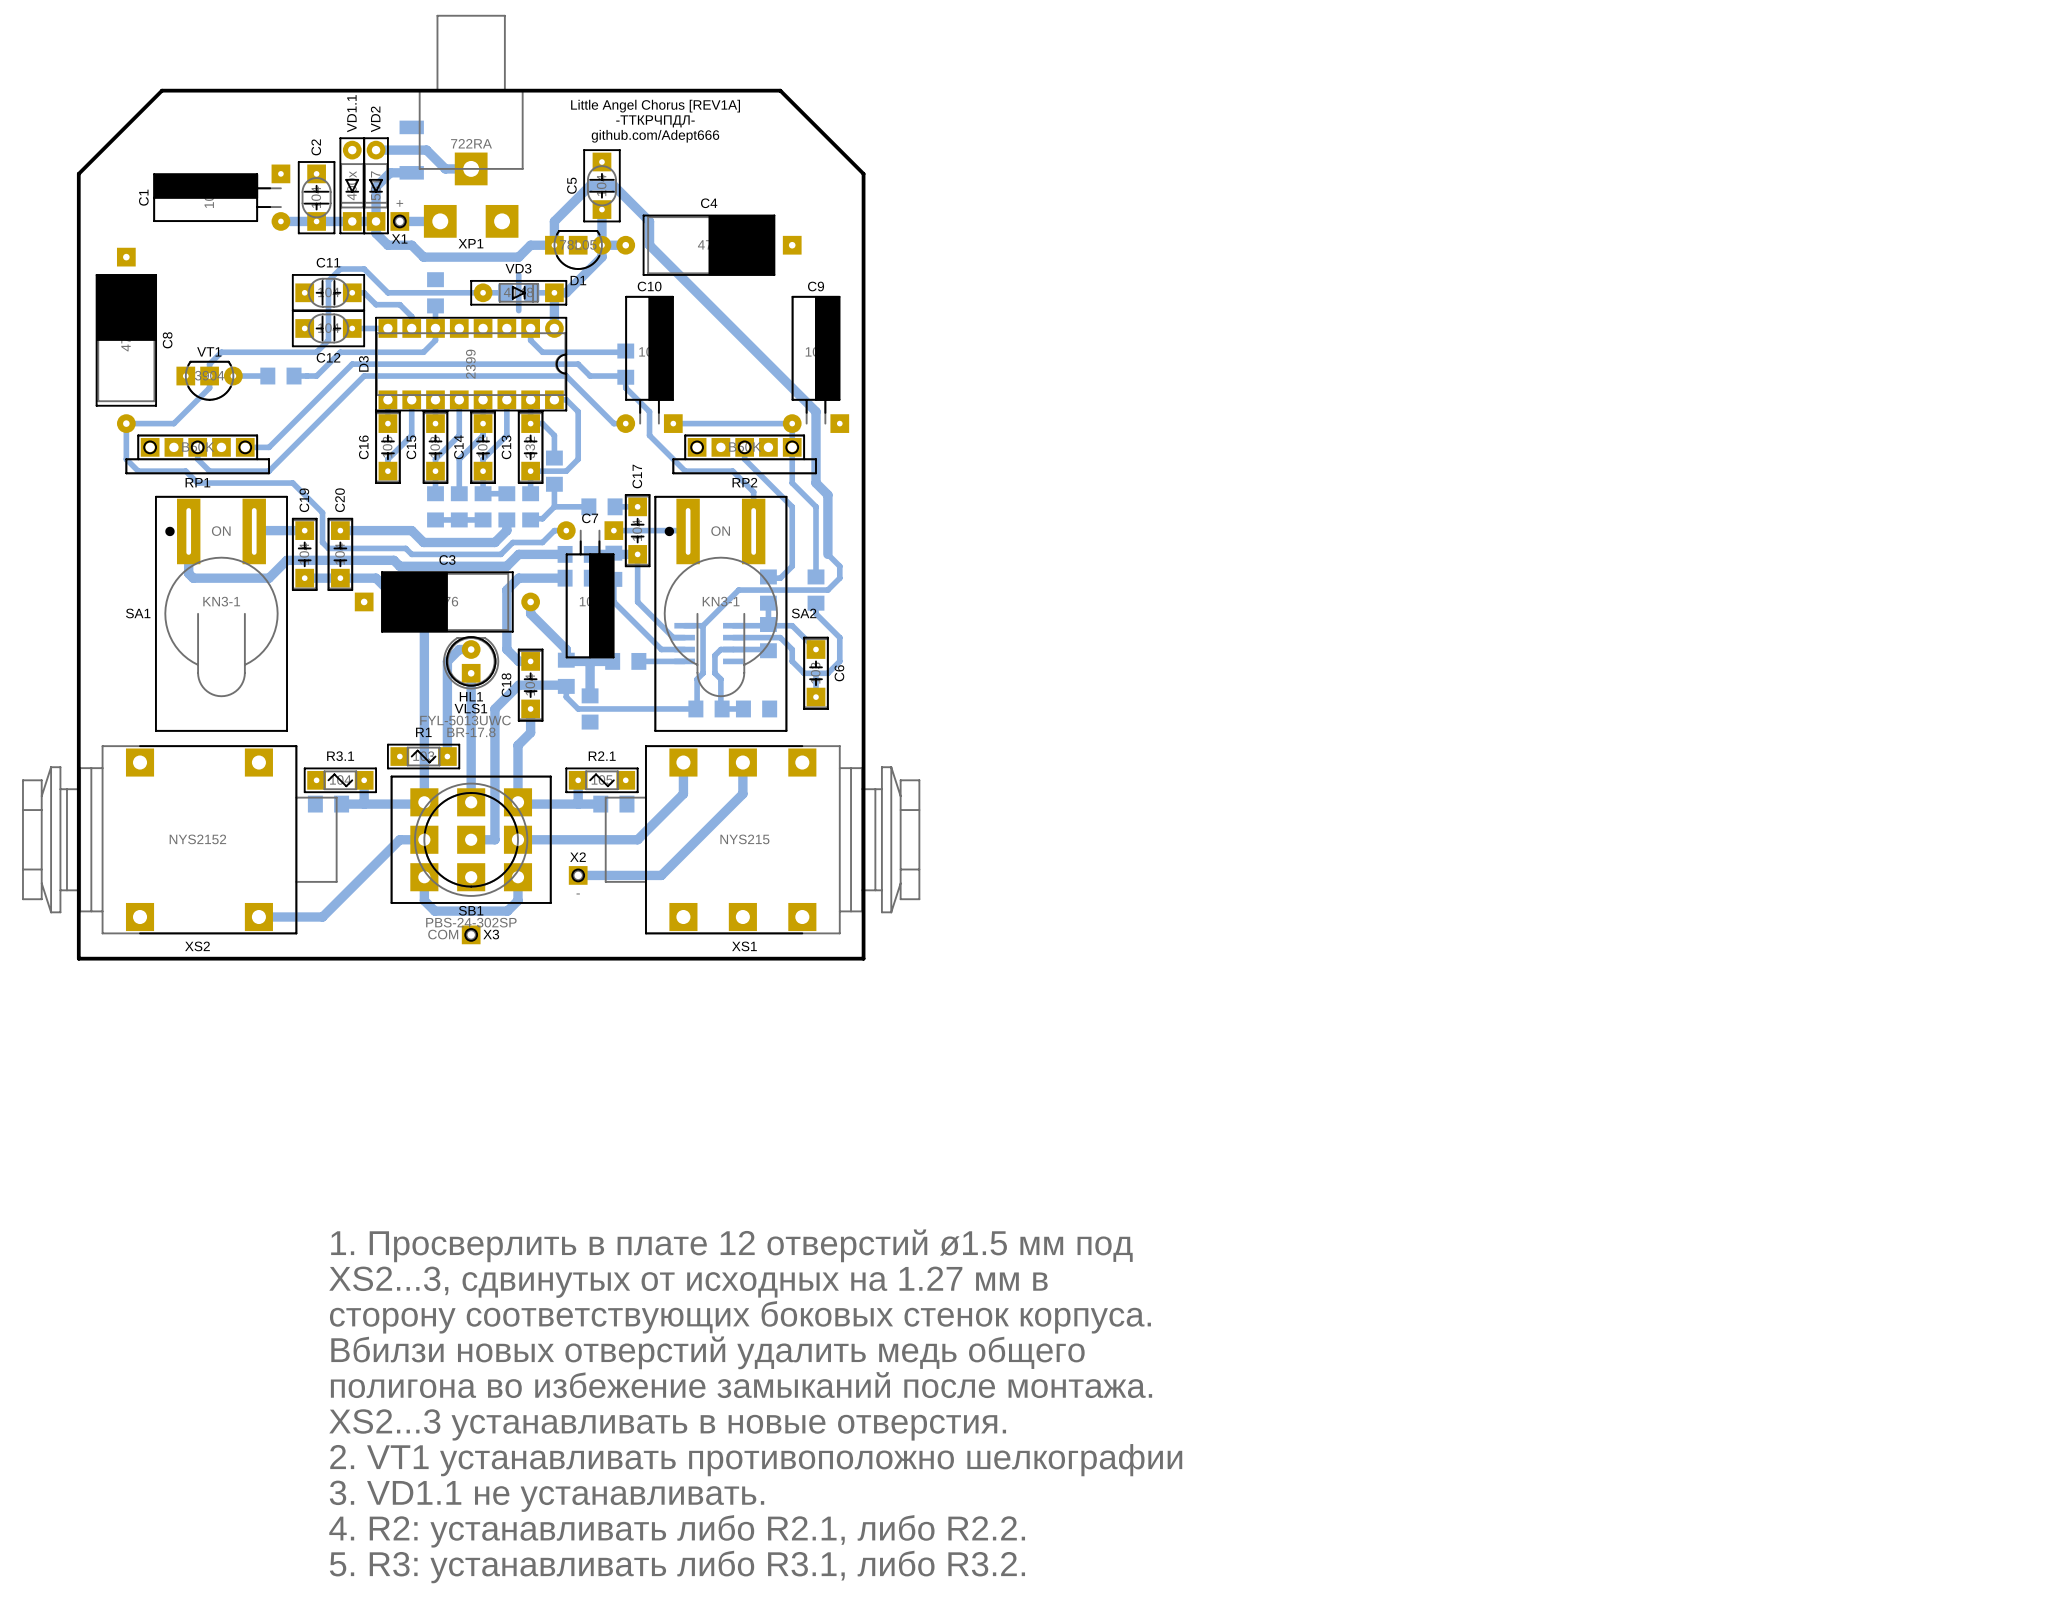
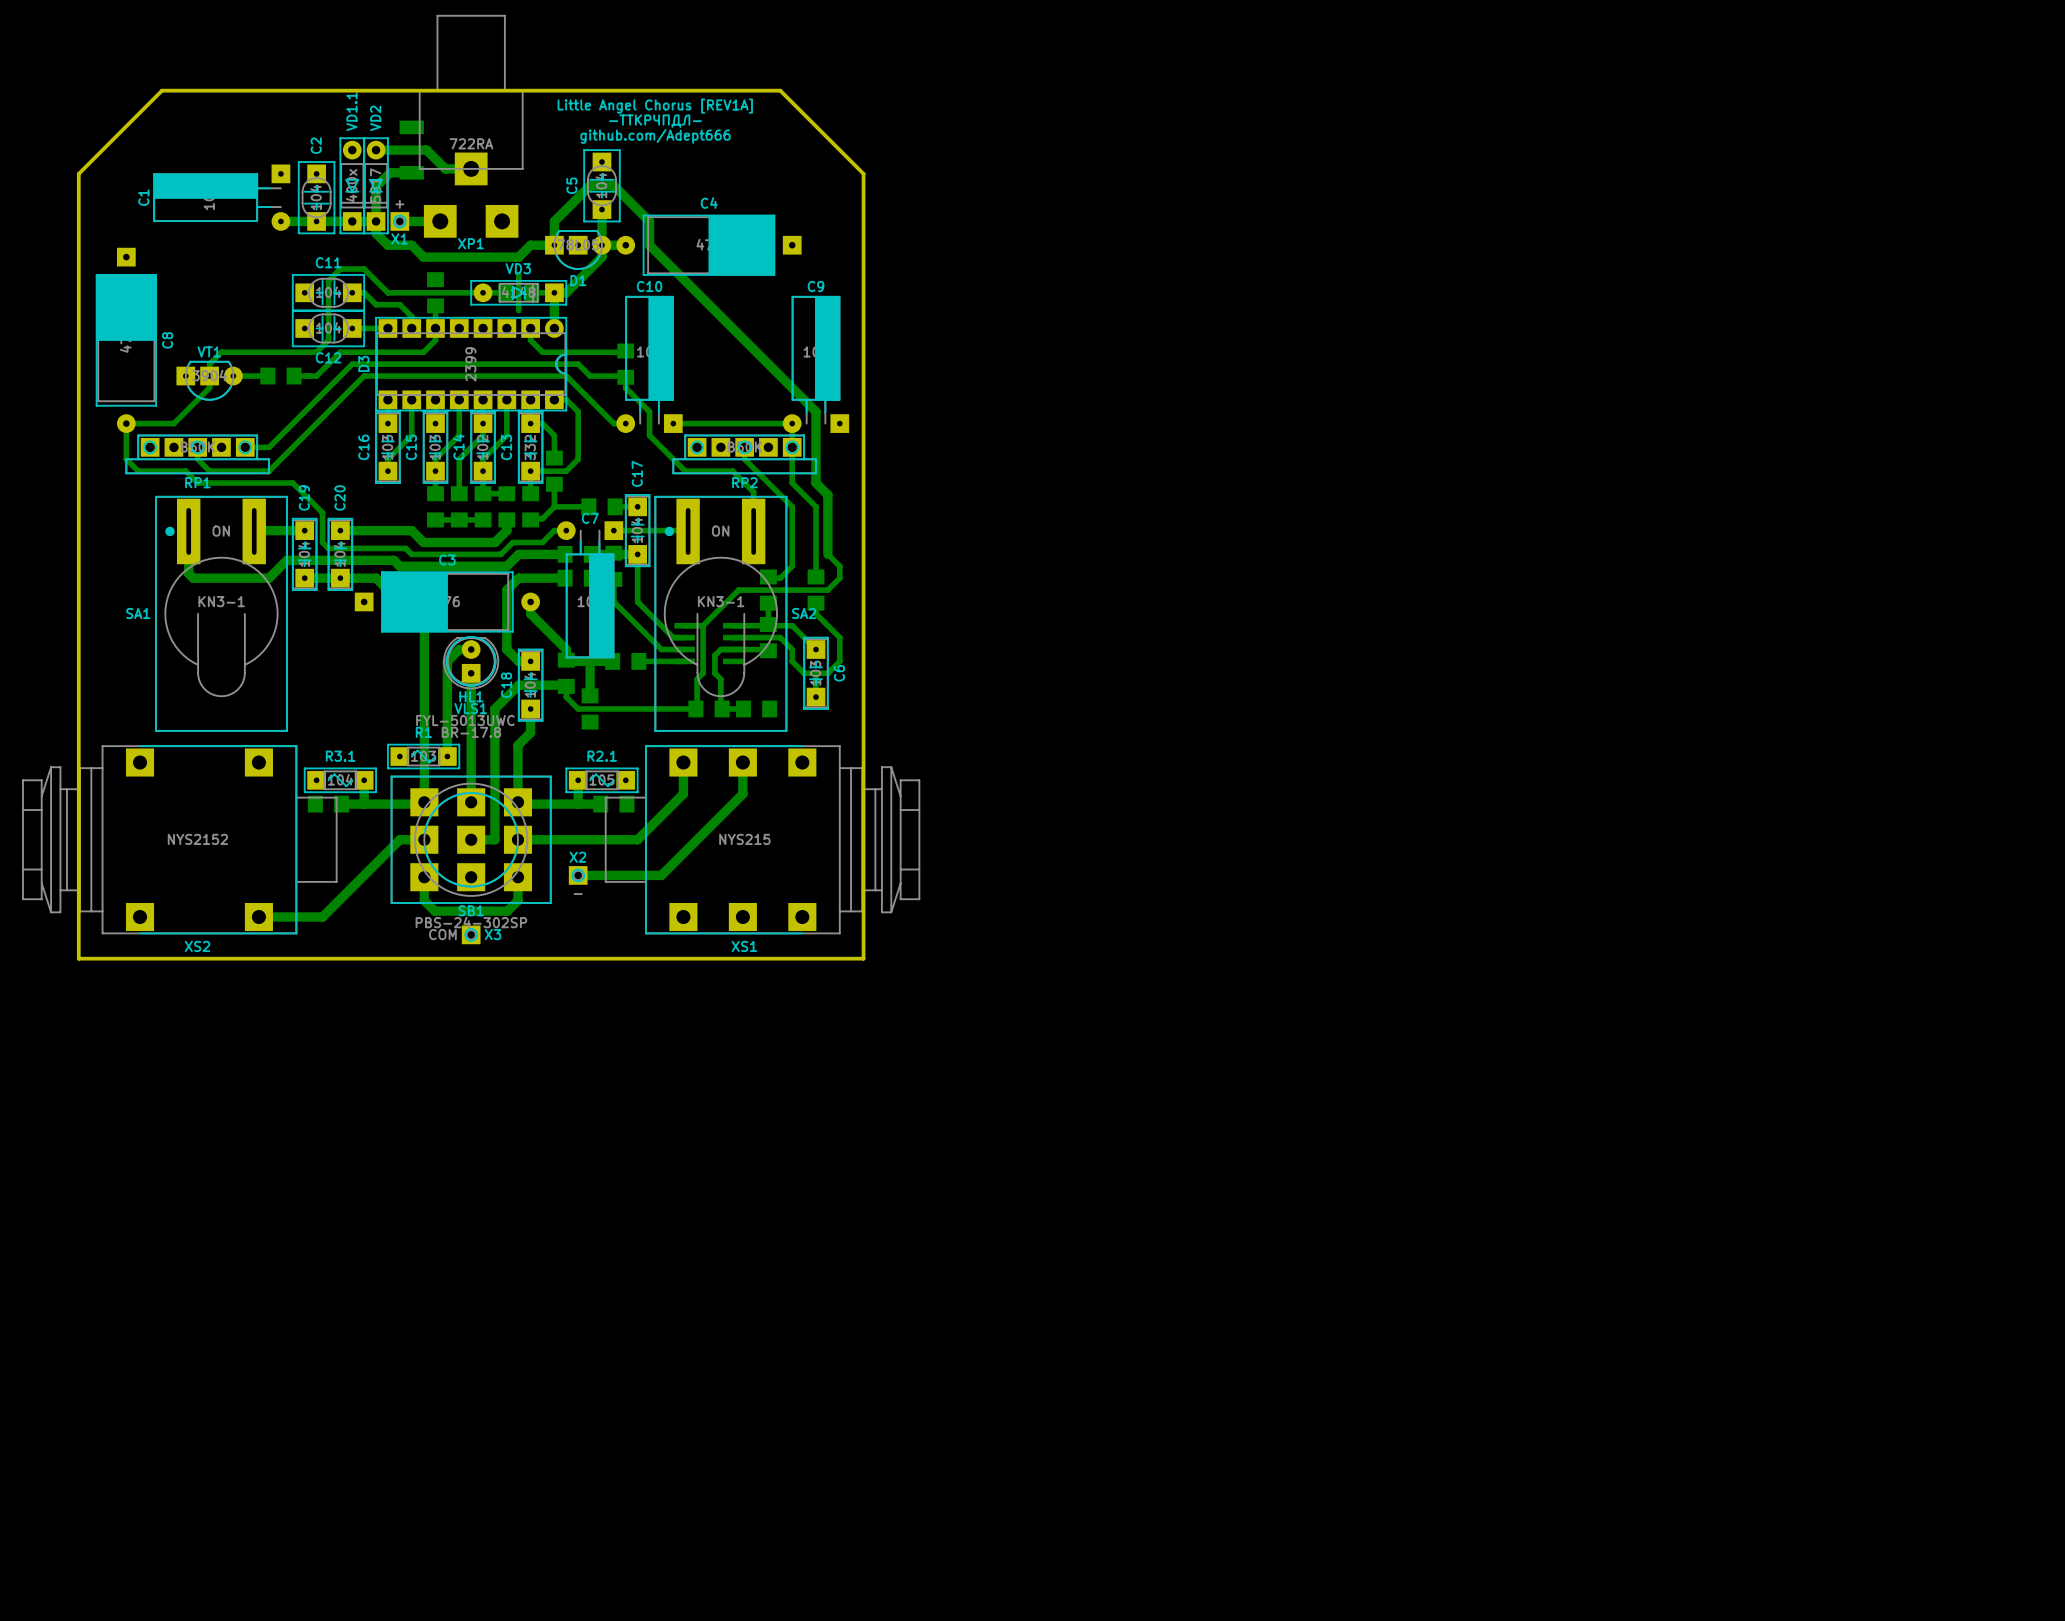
text: 1. Просверлить в плате 12 отверстий ø1.5 мм под (731, 1245) -> none
text: XS2...3, сдвинутых от исходных на 1.27 мм в (688, 1282) -> none
text: сторону соответствующих боковых стенок корпуса. (740, 1317) -> none
text: Вбилзи новых отверстий удалить медь общего (707, 1352) -> none
text: полигона во избежение замыканий после монтажа. (741, 1385) -> none
text: XS2...3 устанавливать в новые отверстия. (667, 1424) -> none
text: 2. VT1 устанавливать противоположно шелкографии (756, 1460) -> none
text: 3. VD1.1 не устанавливать. (546, 1496) -> none
text: 4. R2: устанавливать либо R2.1, либо R2.2. (677, 1531) -> none
text: 5. R3: устанавливать либо R3.1, либо R3.2. (677, 1567) -> none

